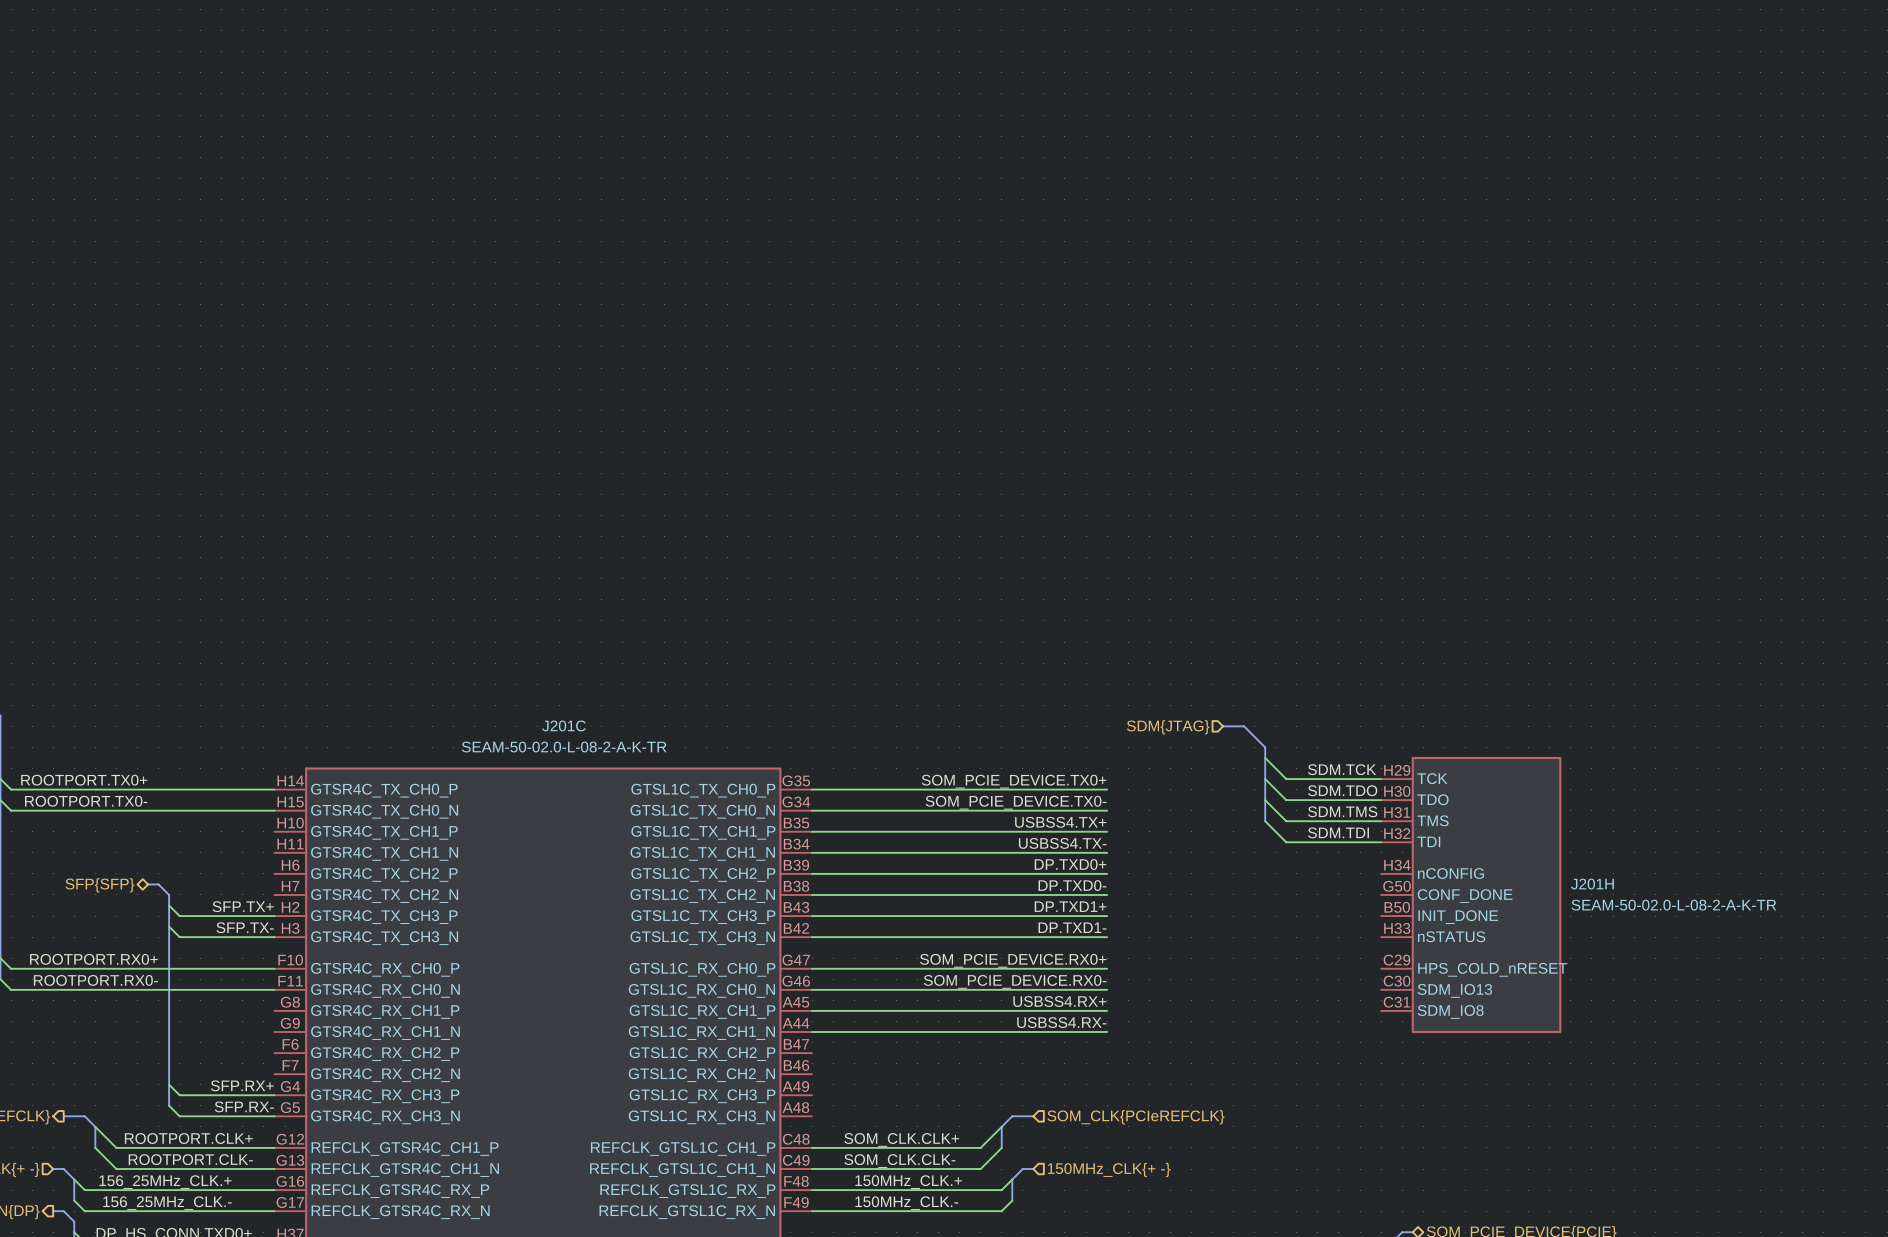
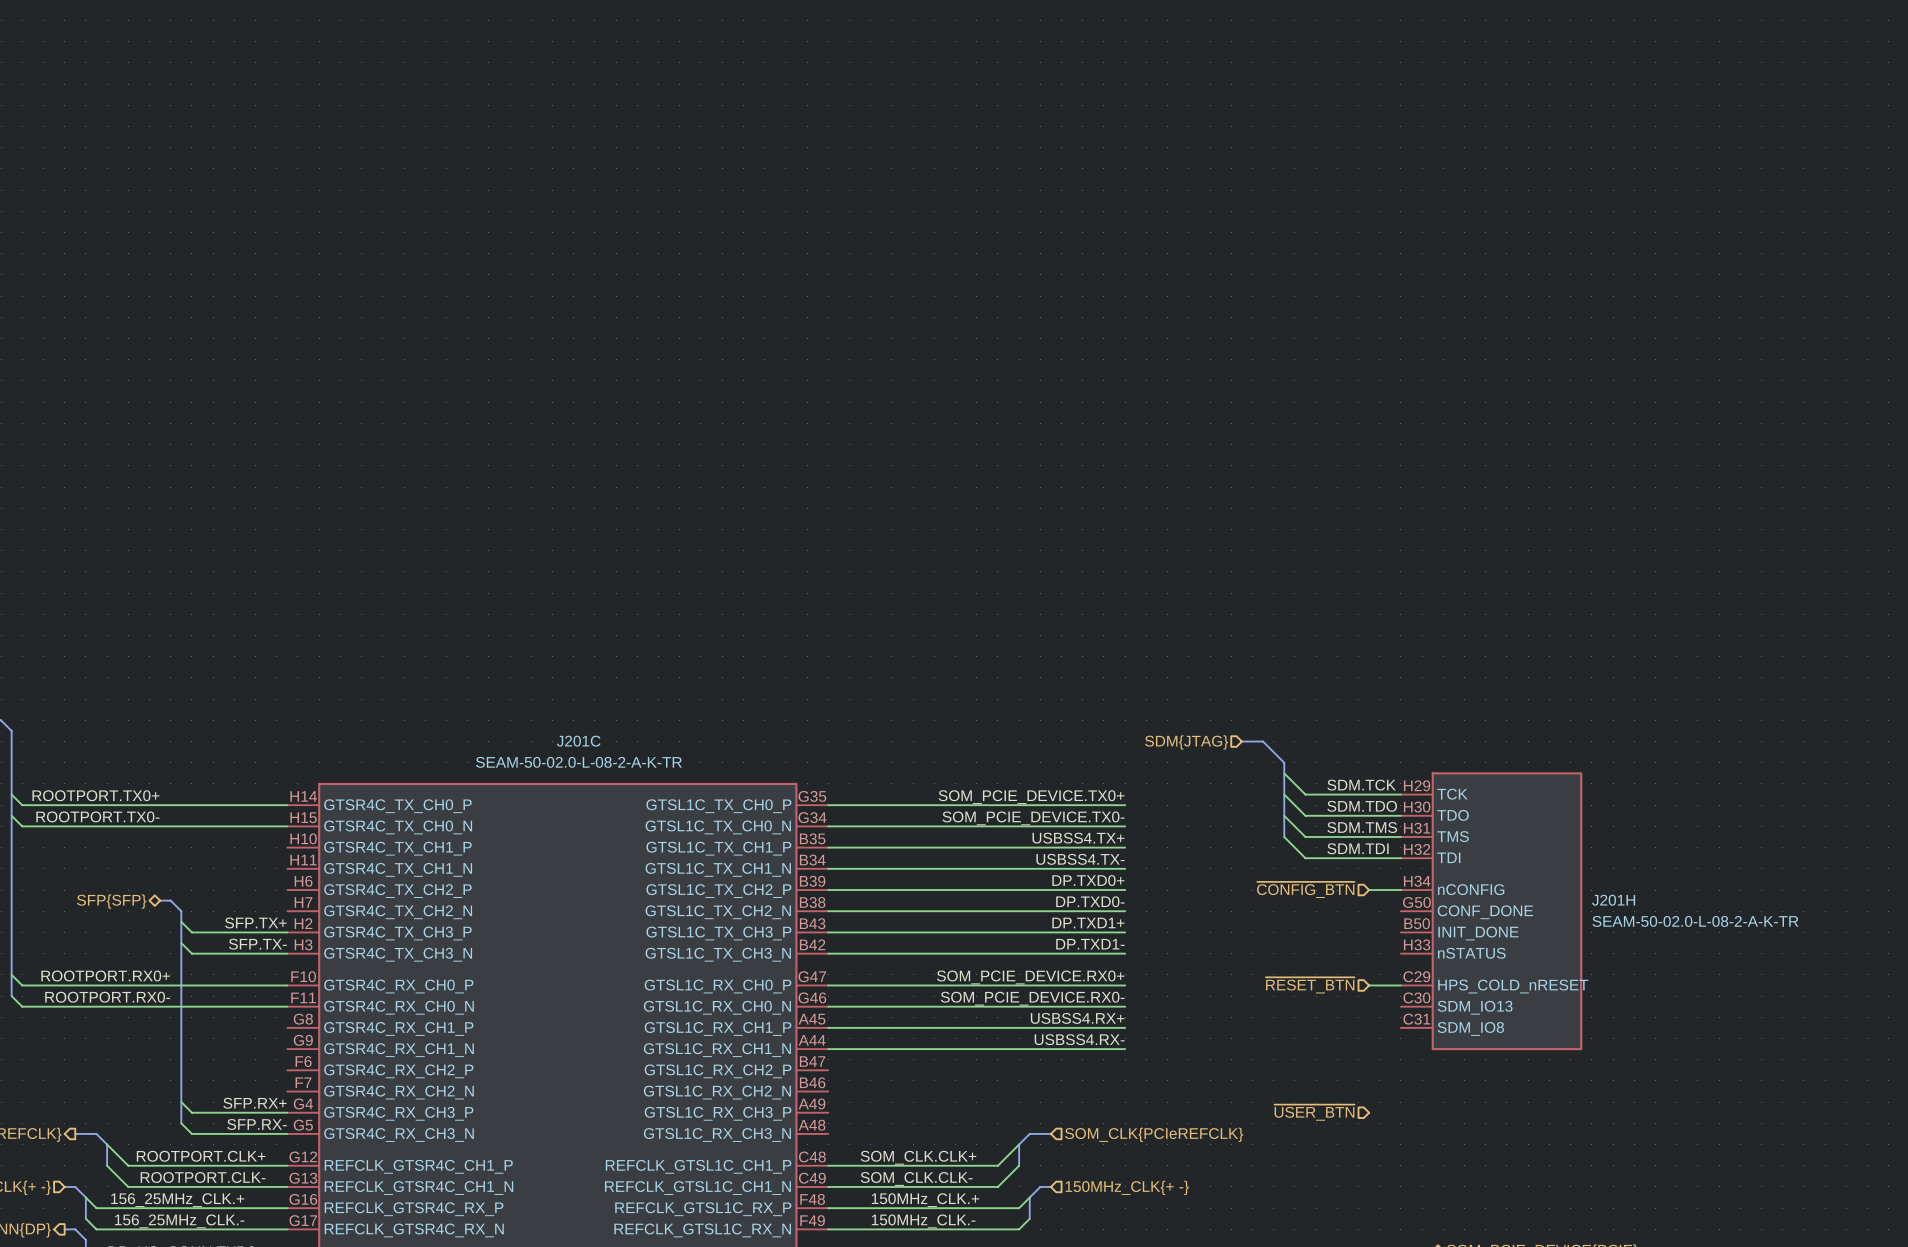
hierarchical label: none -> ~{CONFIG_BTN} (1305, 889)
wire: none -> (1369, 890) (1400, 890)
hierarchical label: none -> ~{RESET_BTN} (1310, 985)
wire: none -> (1369, 985) (1400, 985)
hierarchical label: none -> ~{USER_BTN} (1314, 1112)

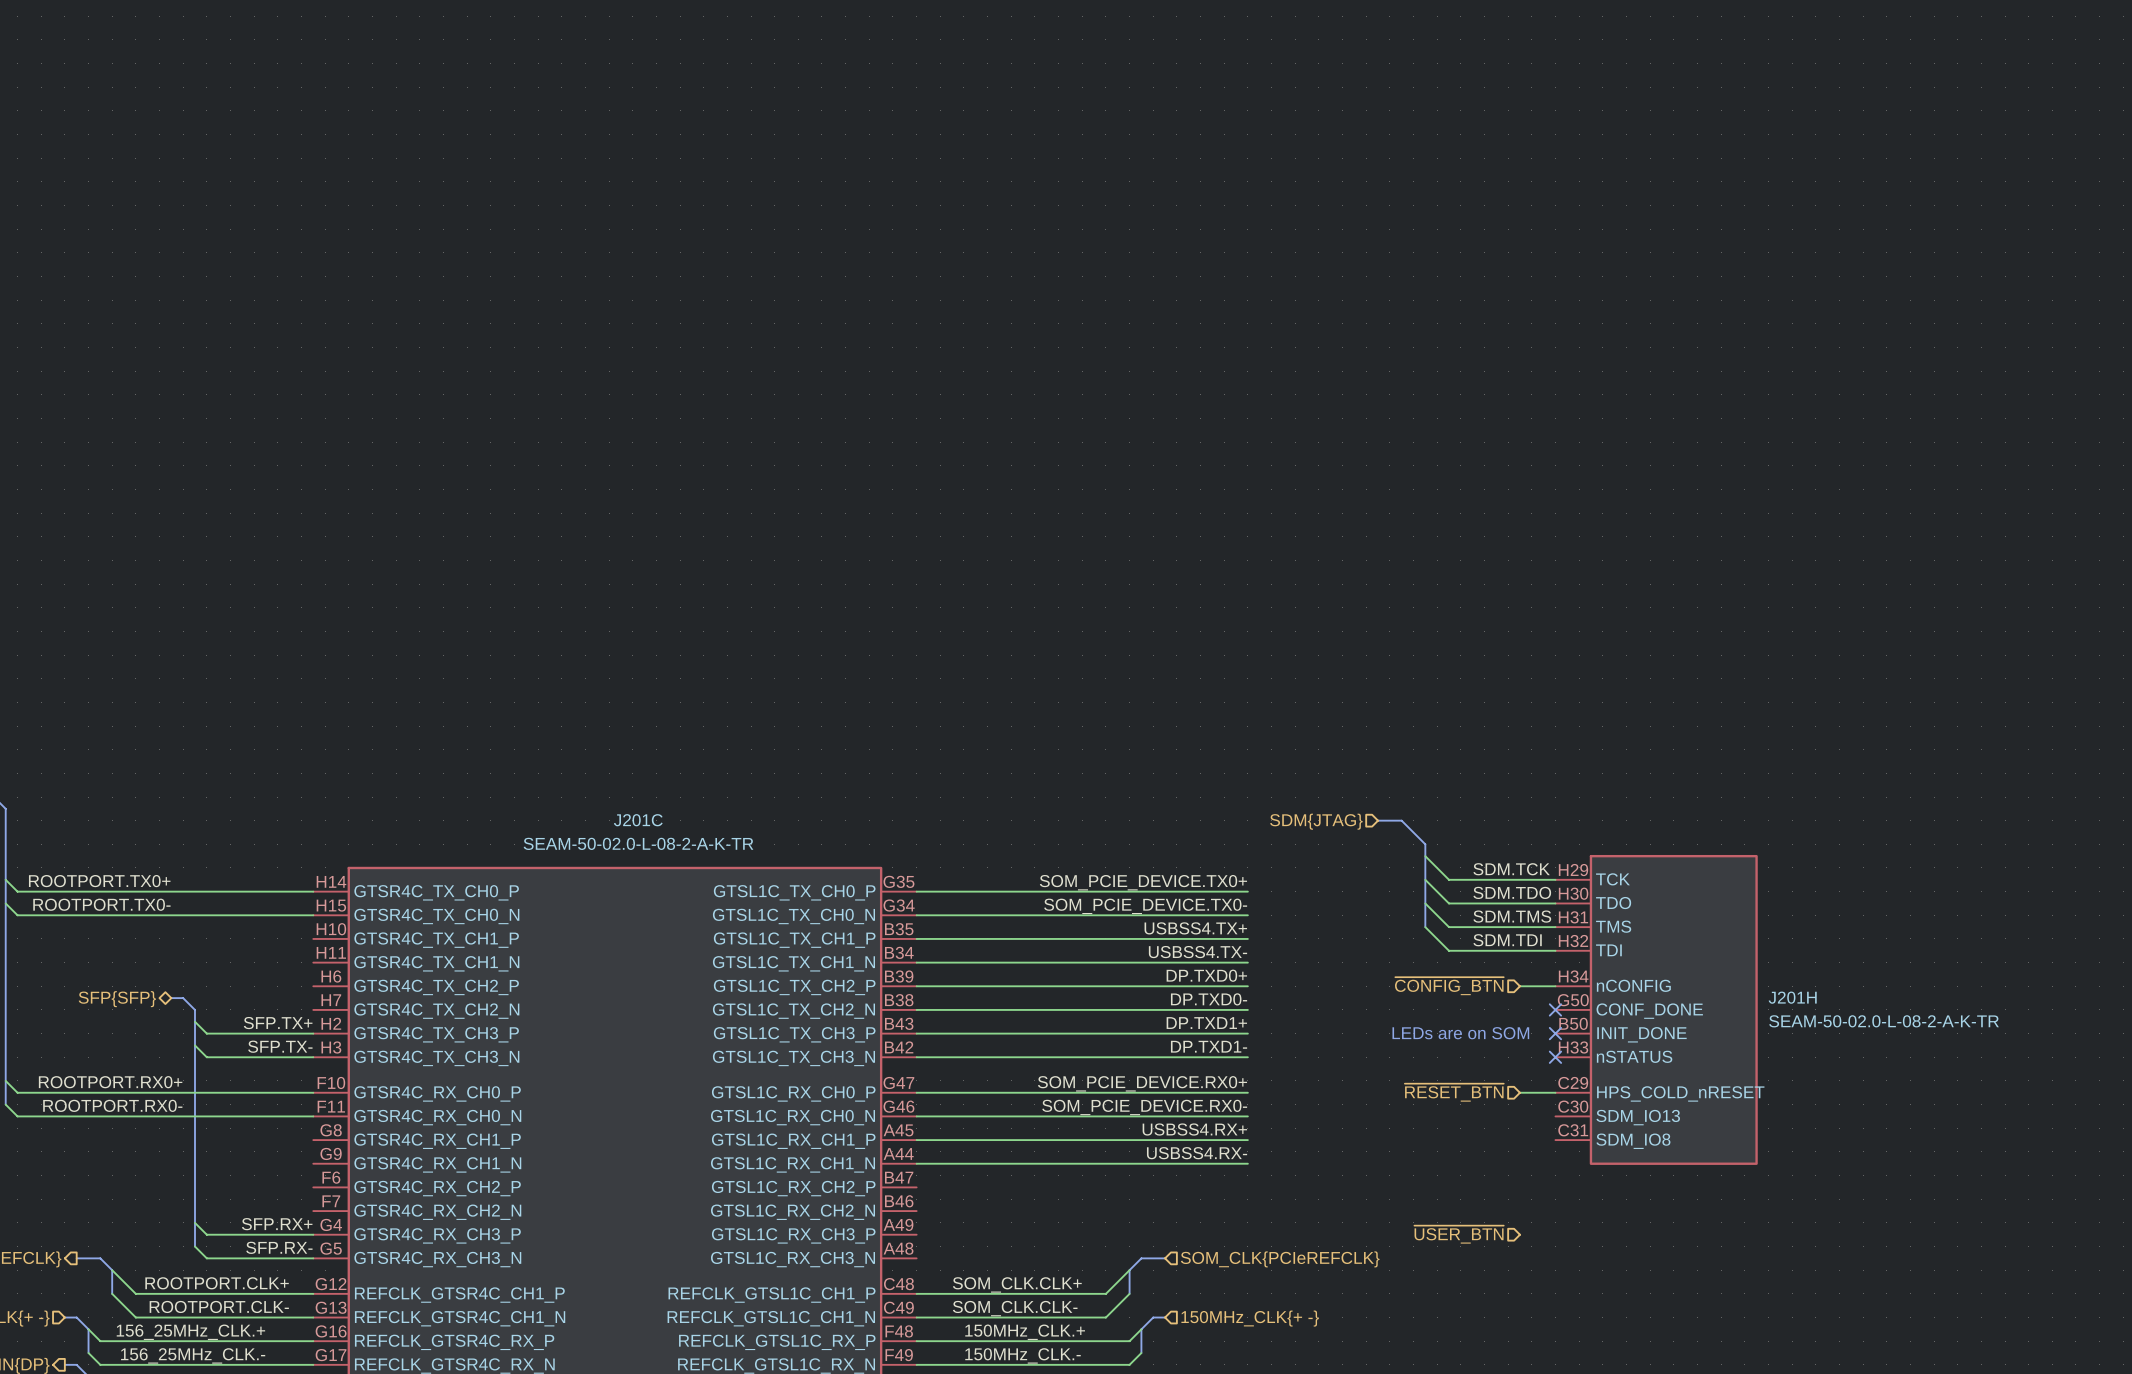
no-connect mark: none -> (1555, 1009)
text: none -> LEDs are on SOM (1460, 1033)
no-connect mark: none -> (1555, 1033)
no-connect mark: none -> (1555, 1057)

